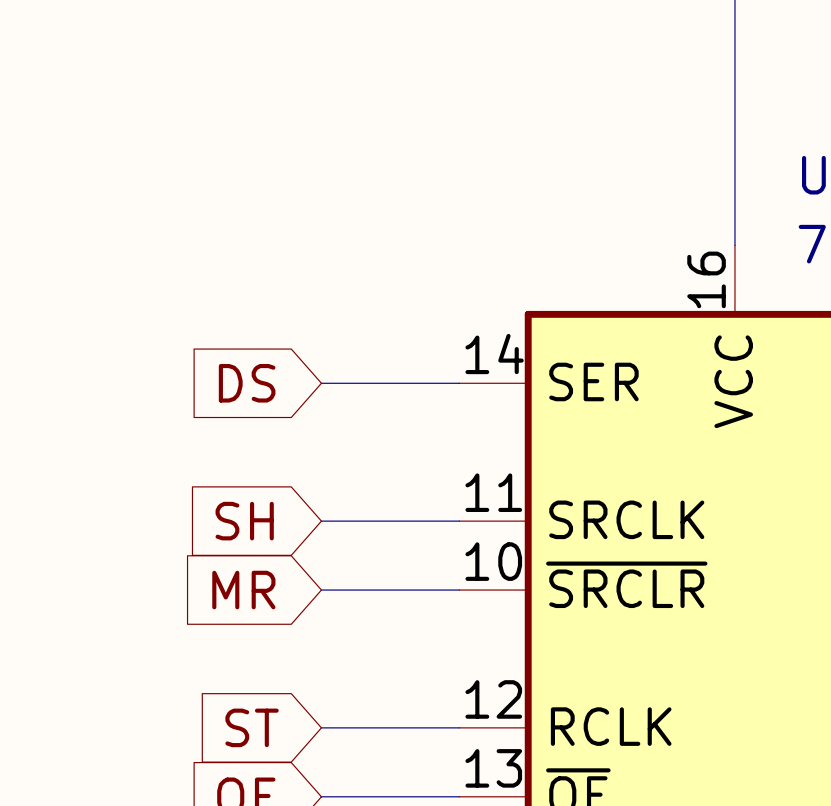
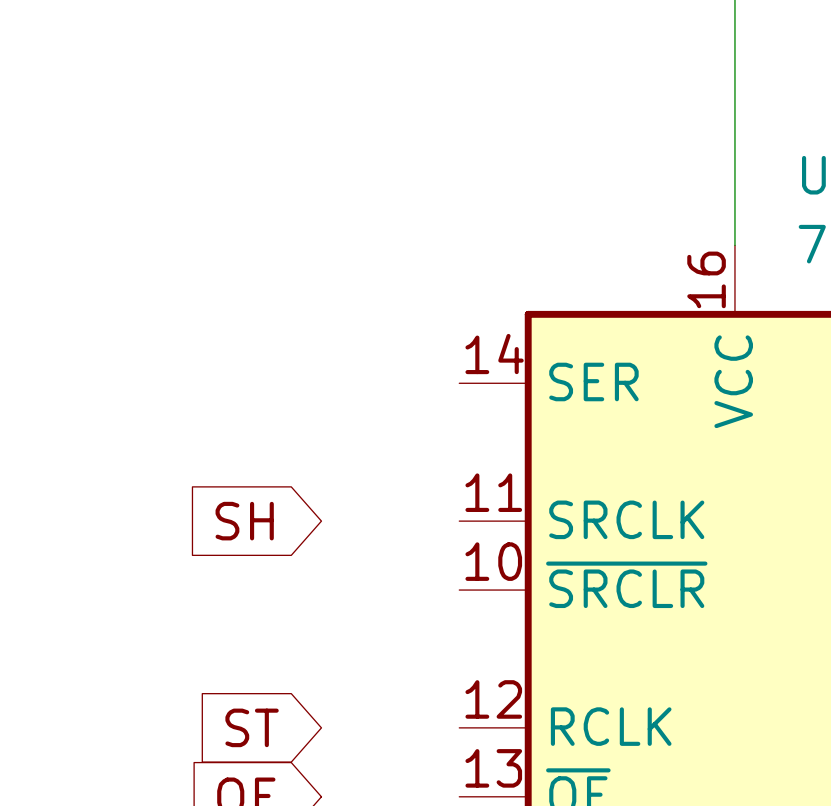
global label: DS (247, 383) -> none
wire: (321, 383) (459, 383) -> none
wire: (321, 521) (459, 521) -> none
global label: MR (243, 590) -> none
wire: (321, 590) (459, 590) -> none
wire: (321, 727) (459, 727) -> none
wire: (321, 796) (459, 796) -> none

